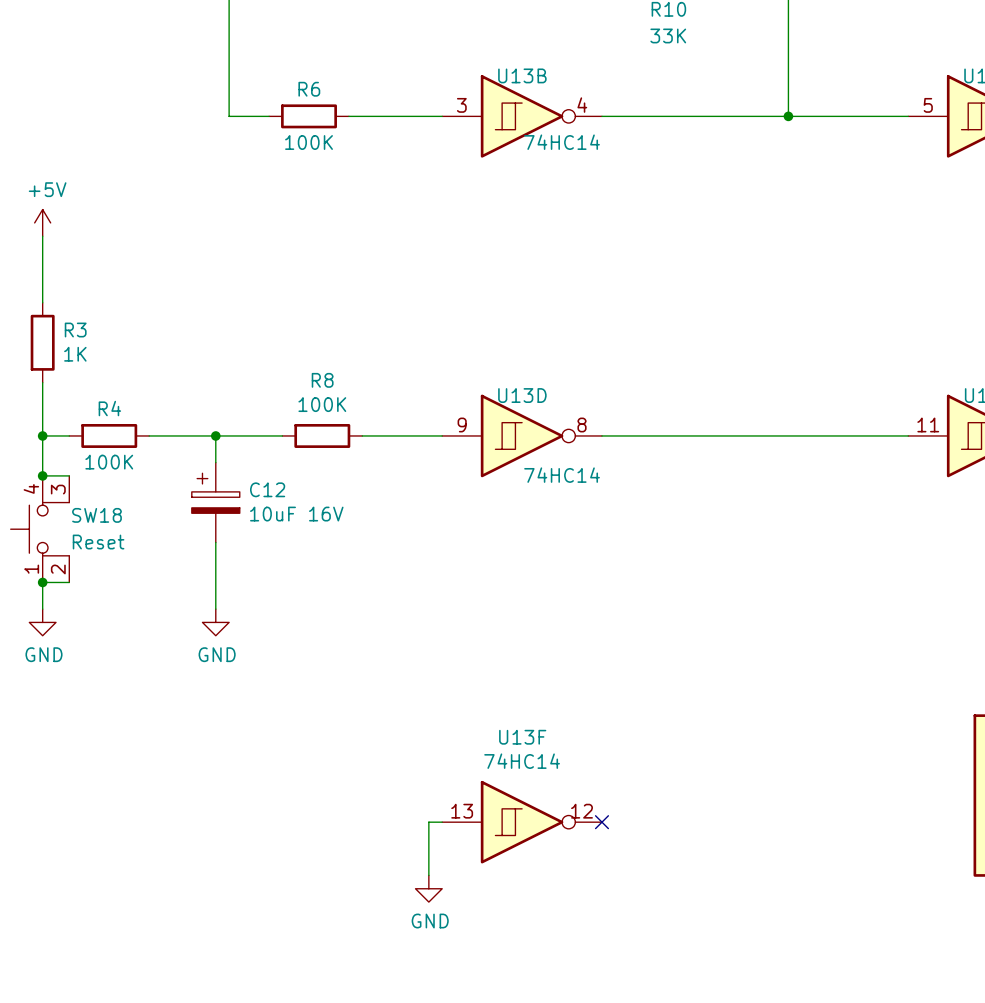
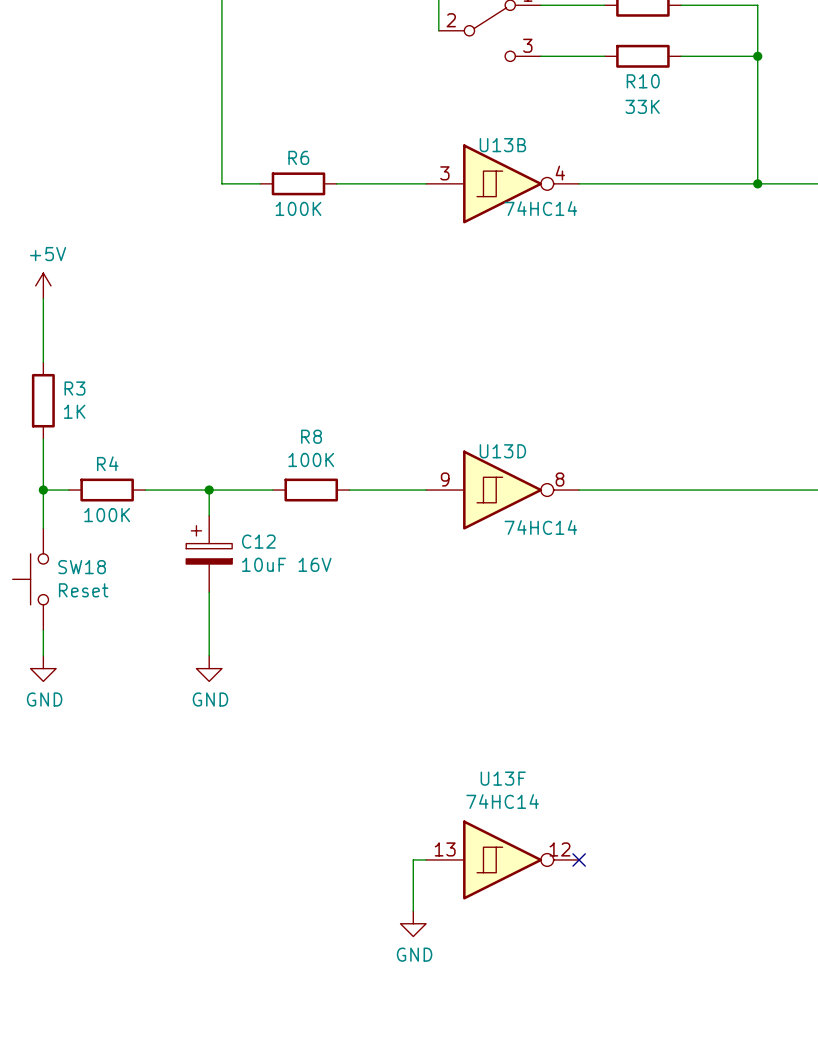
SW18 symbol: [10, 475, 70, 583] -> [12, 528, 49, 631]
wire: (42, 475) (69, 475) -> none
junction: (42, 475) -> none
wire: (42, 582) (69, 582) -> none
junction: (42, 582) -> none

